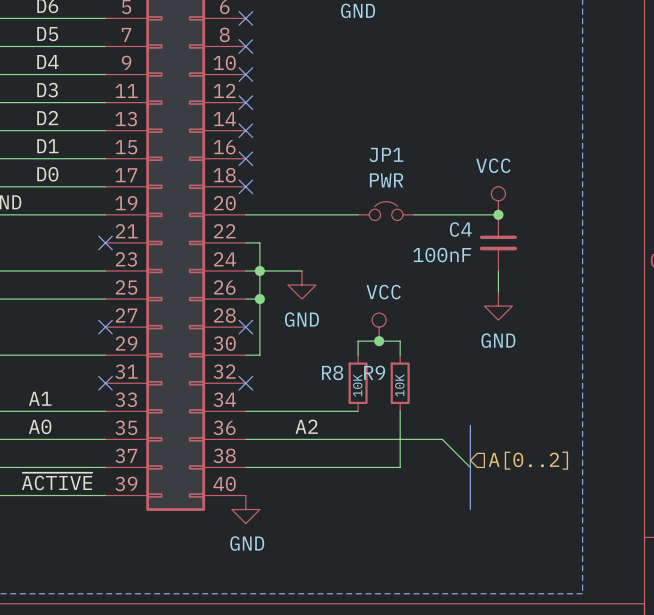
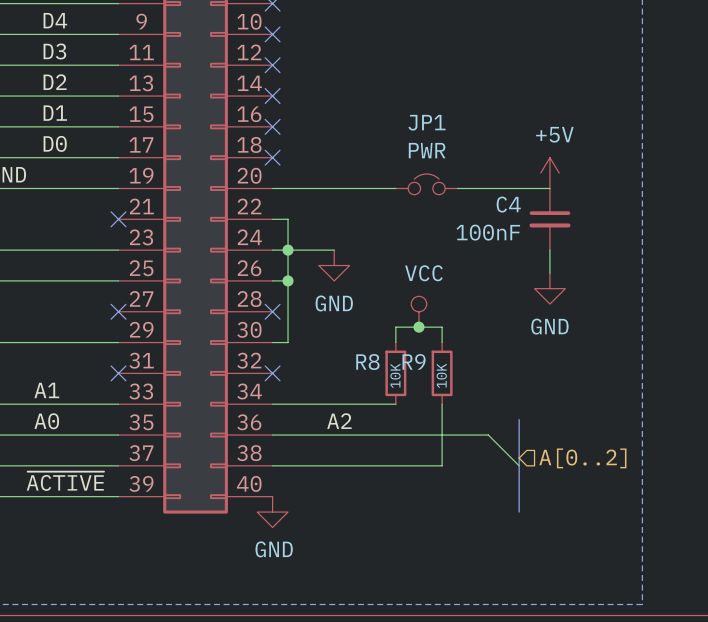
power symbol: VCC (498, 200) -> +5V (549, 173)
junction: (498, 214) -> none

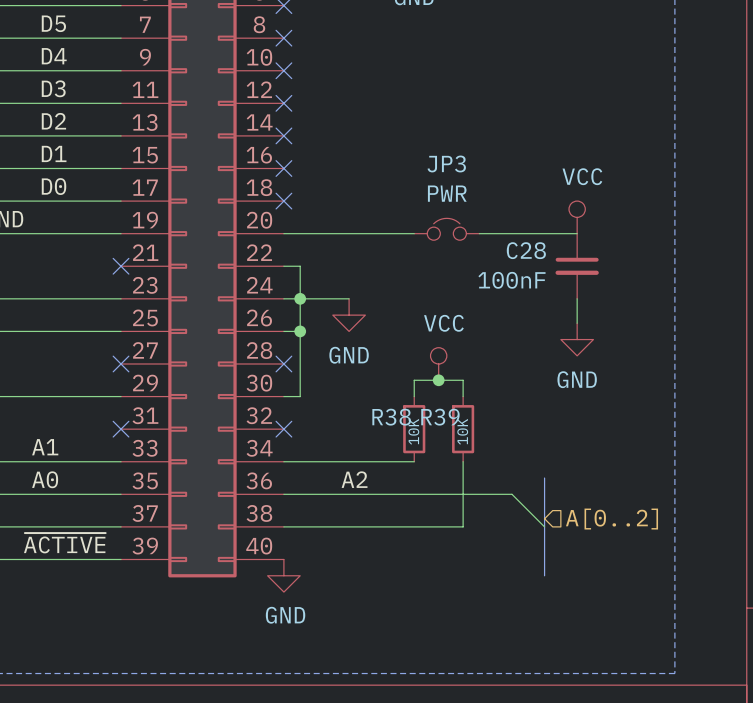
JP1 name: JP1 (426, 122) -> JP3 (446, 163)
power symbol: +5V (549, 173) -> VCC (577, 217)
C4 name: C4 (508, 204) -> C28 (526, 250)
R9 name: R9 (414, 361) -> R39 (440, 417)
R8 name: R8 (367, 362) -> R38 (391, 417)

